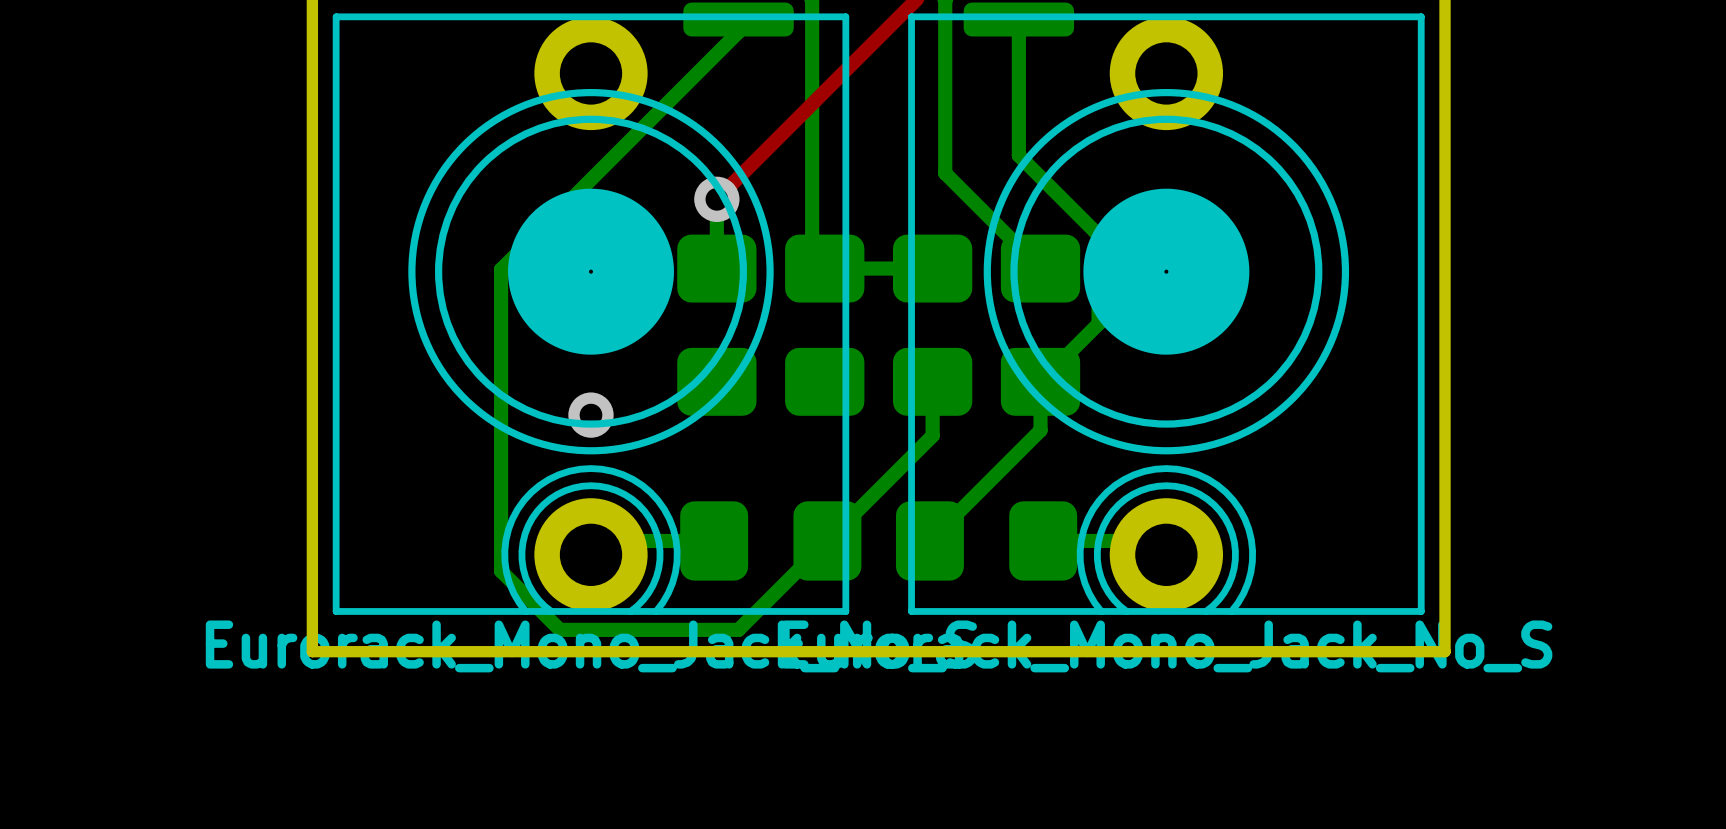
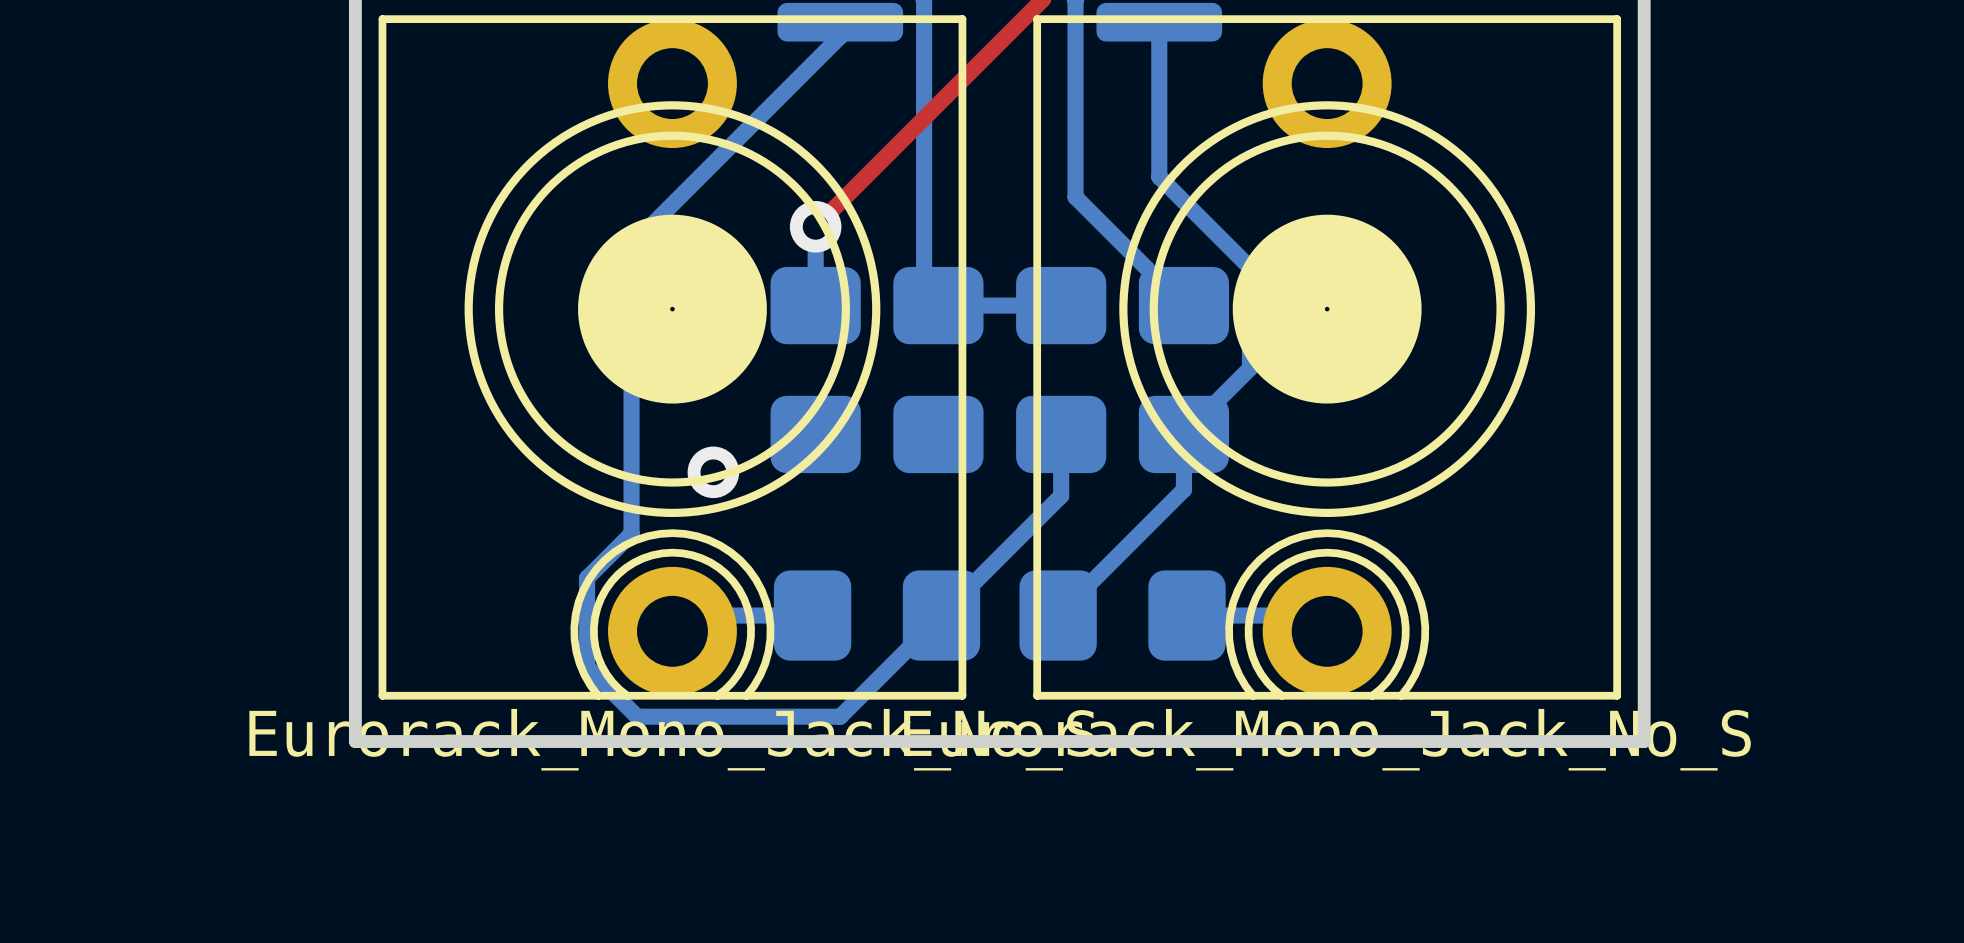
bottom track: (555, 215) (501, 269) (501, 571) (515, 585) -> (631, 245) (631, 533) (587, 578) (587, 666)
via position: (590, 415) -> (713, 472)

